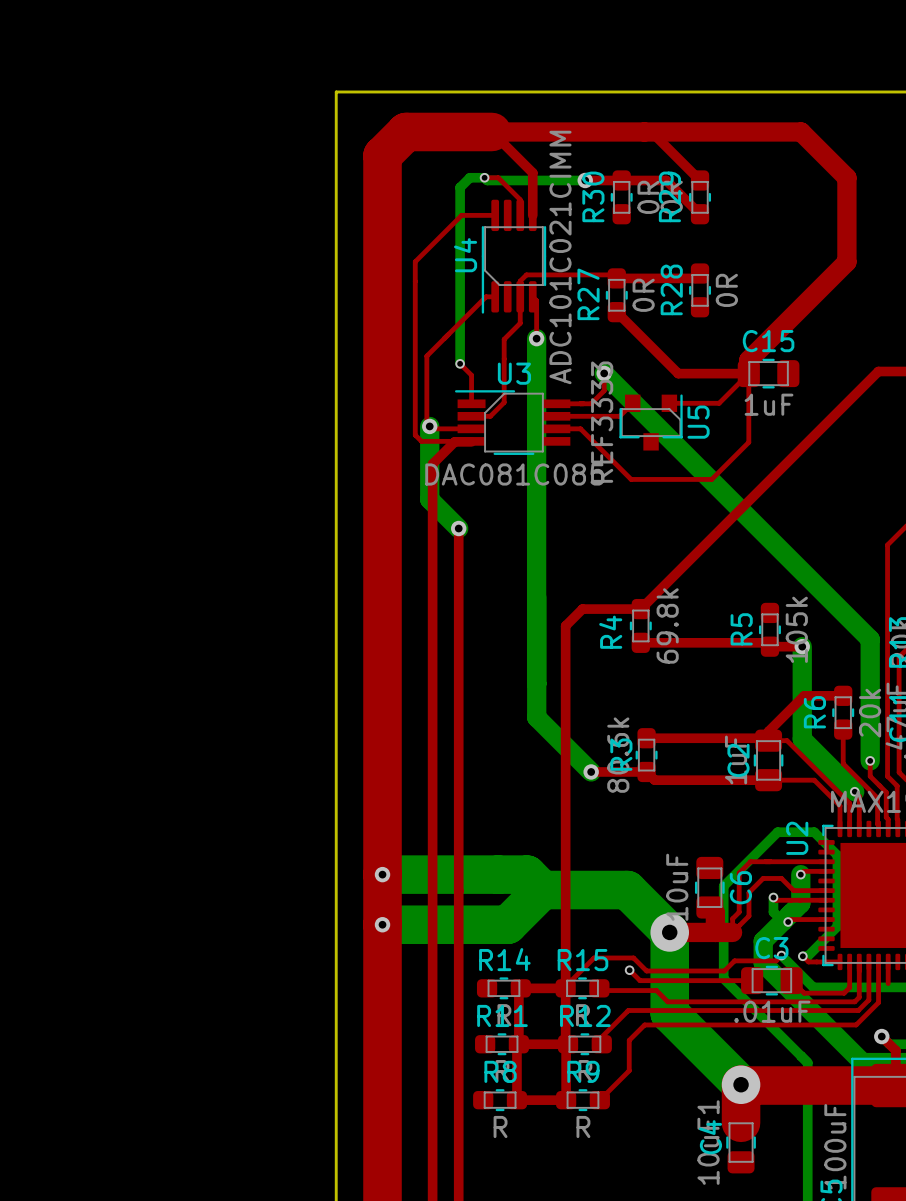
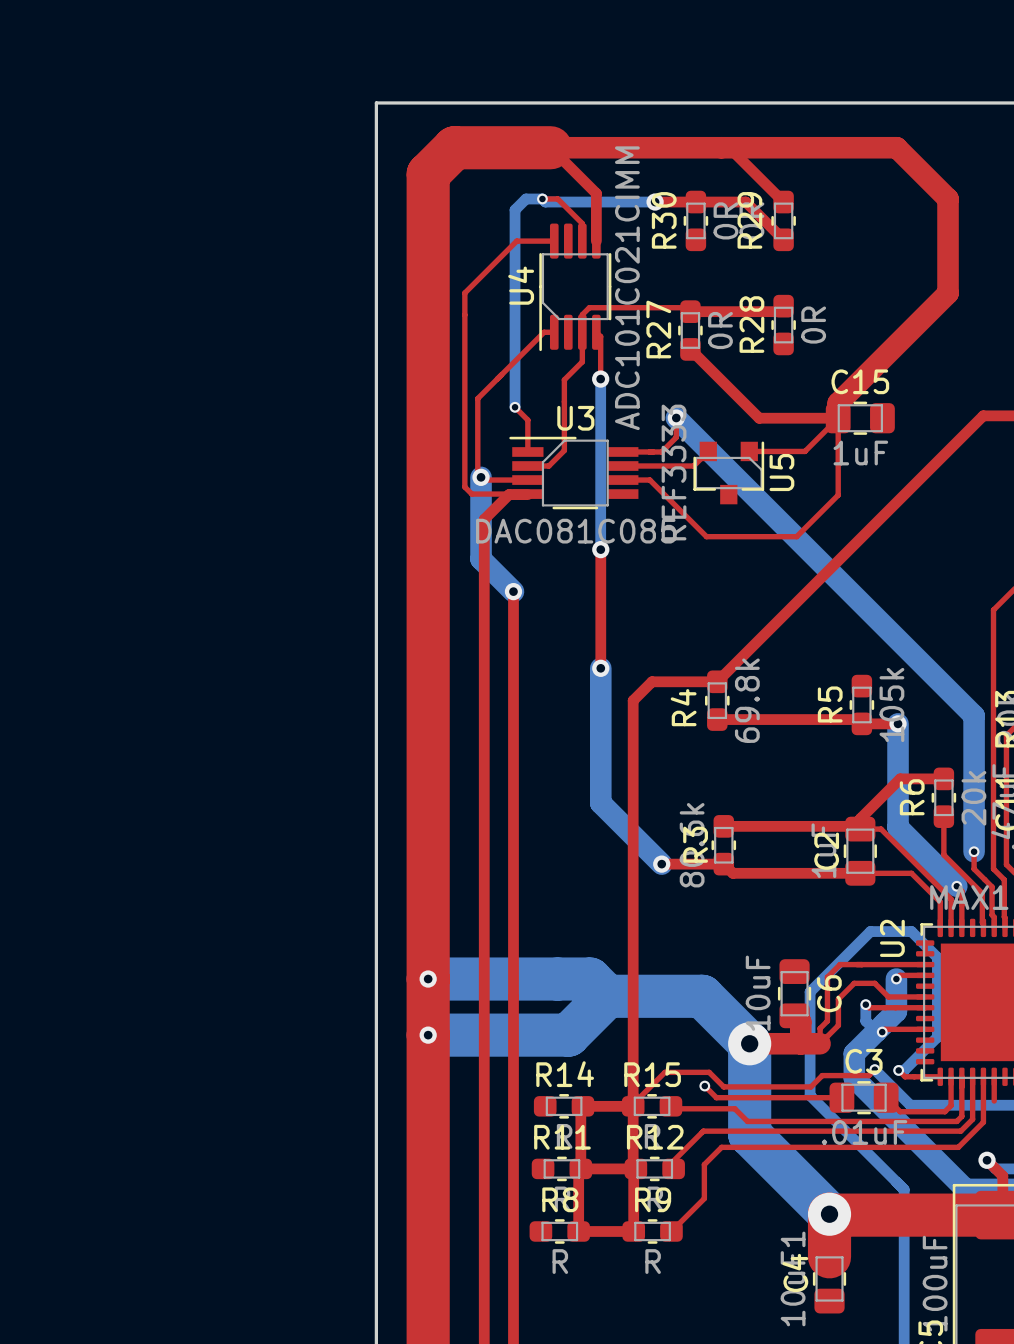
bottom track width: thick (536, 338) (536, 490) -> thin (600, 379) (600, 549)
bottom track: (536, 490) (536, 683) -> none
top track: none -> (600, 549) (600, 668)
via: none -> (600, 549)
via: none -> (600, 668)

